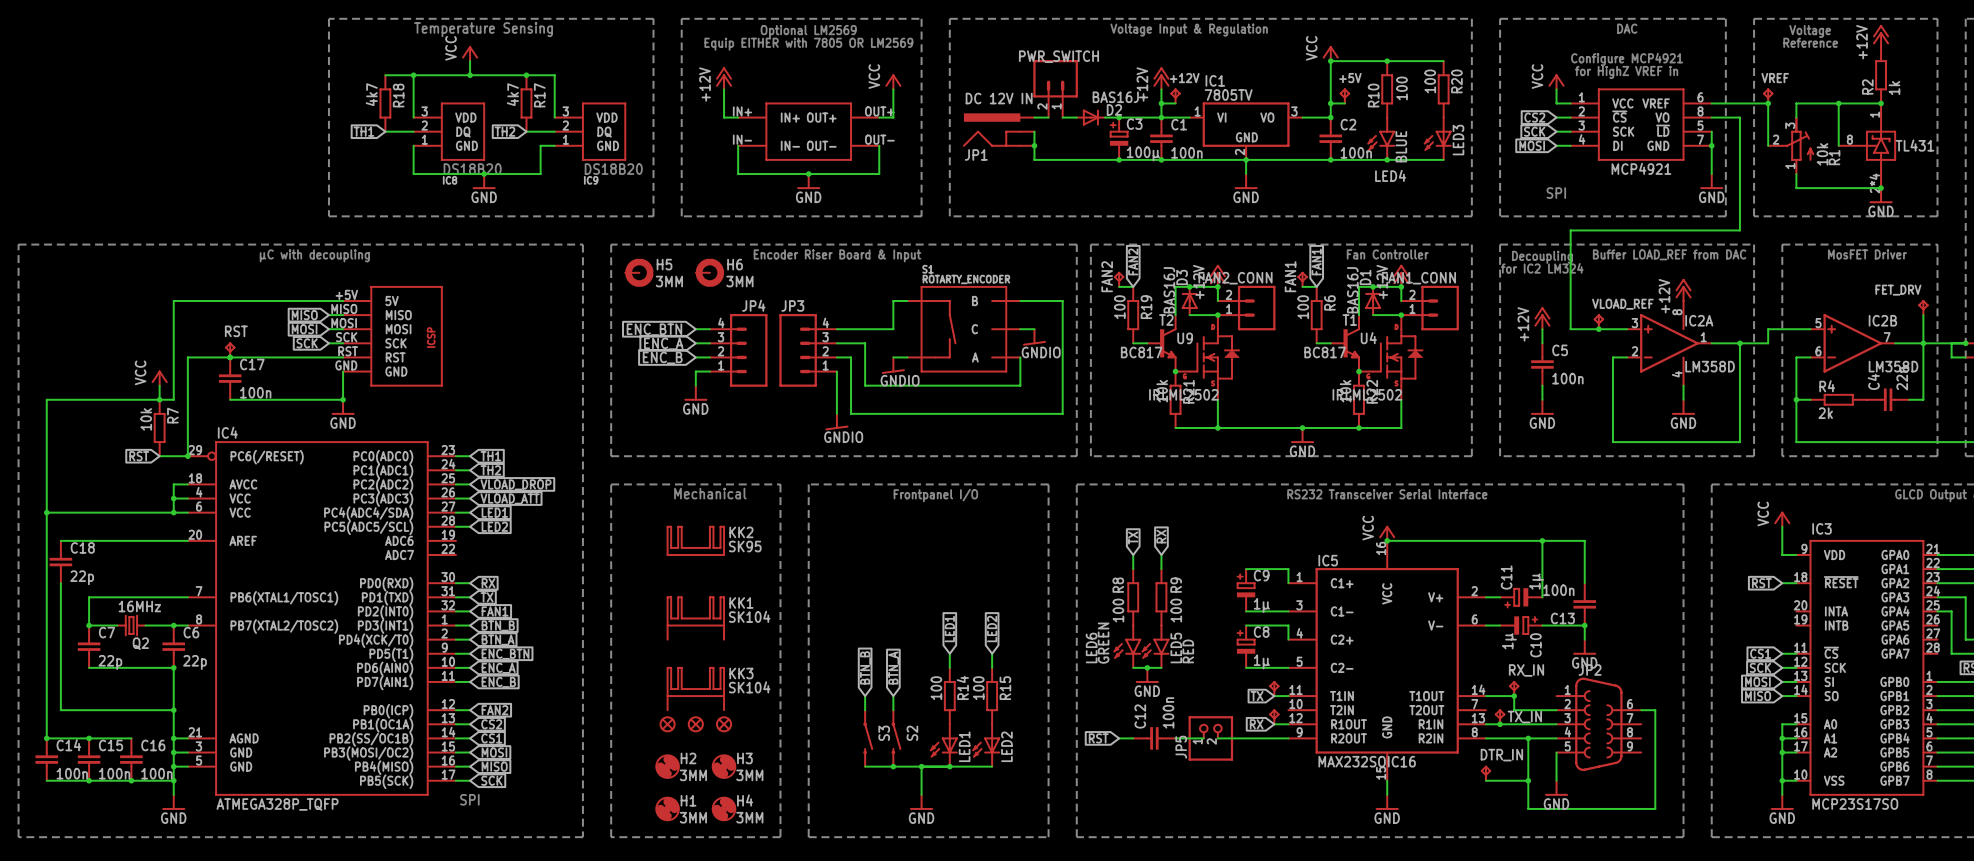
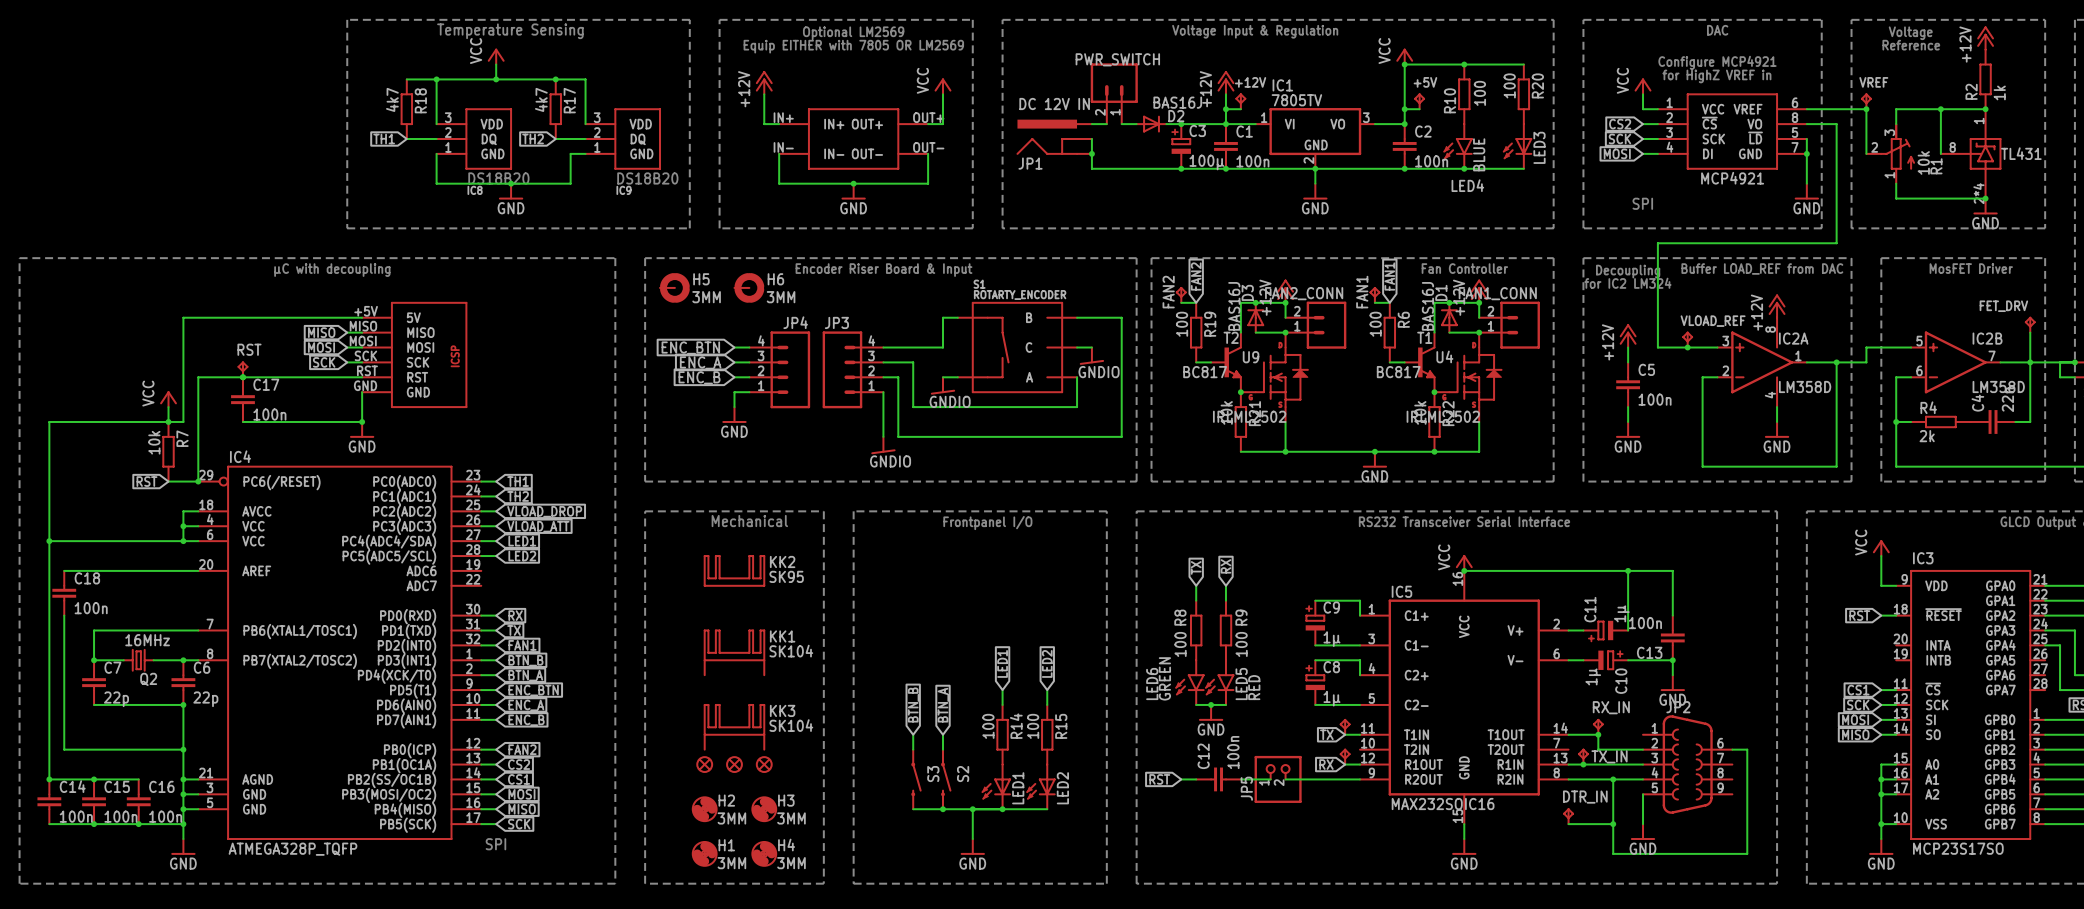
C18 value: 22p (82, 577) -> 100n (91, 608)

